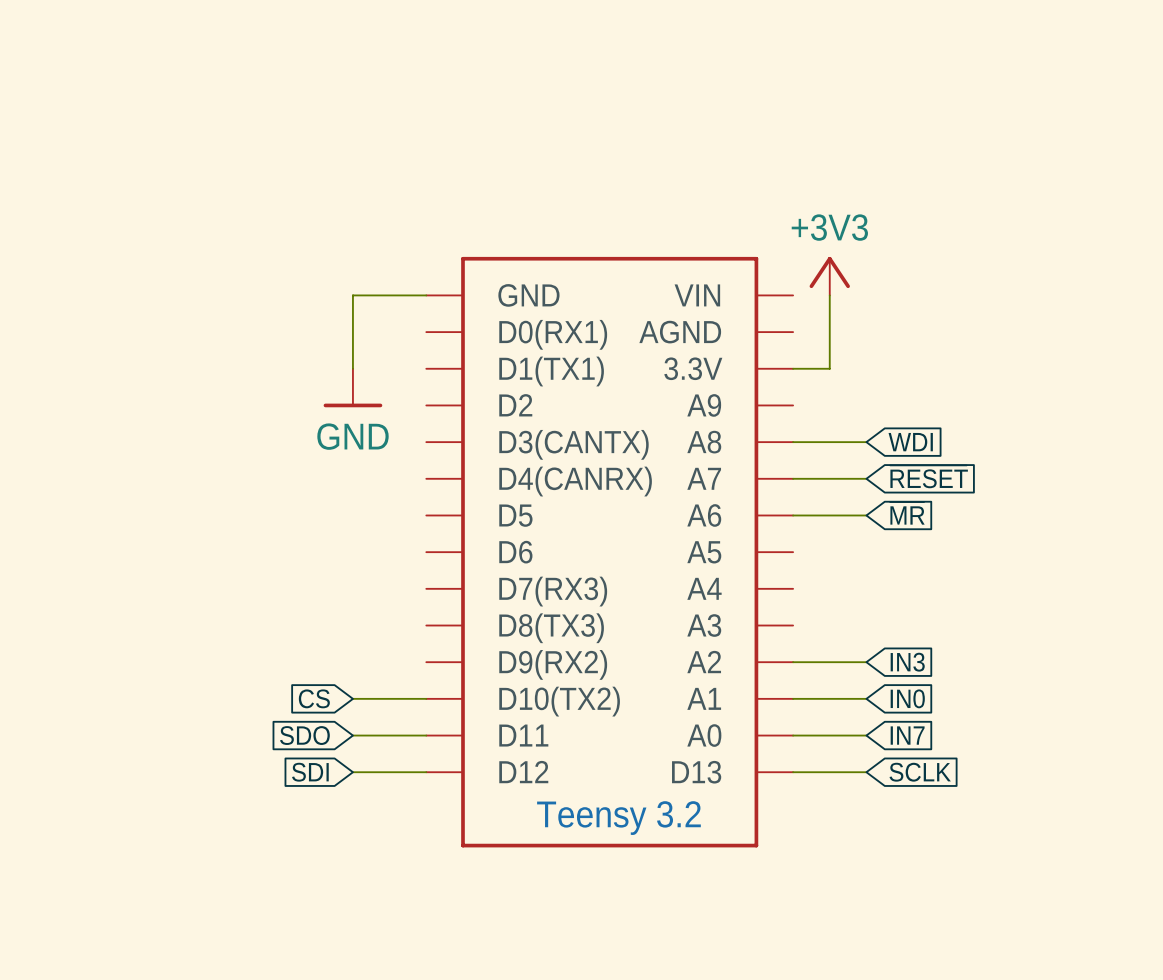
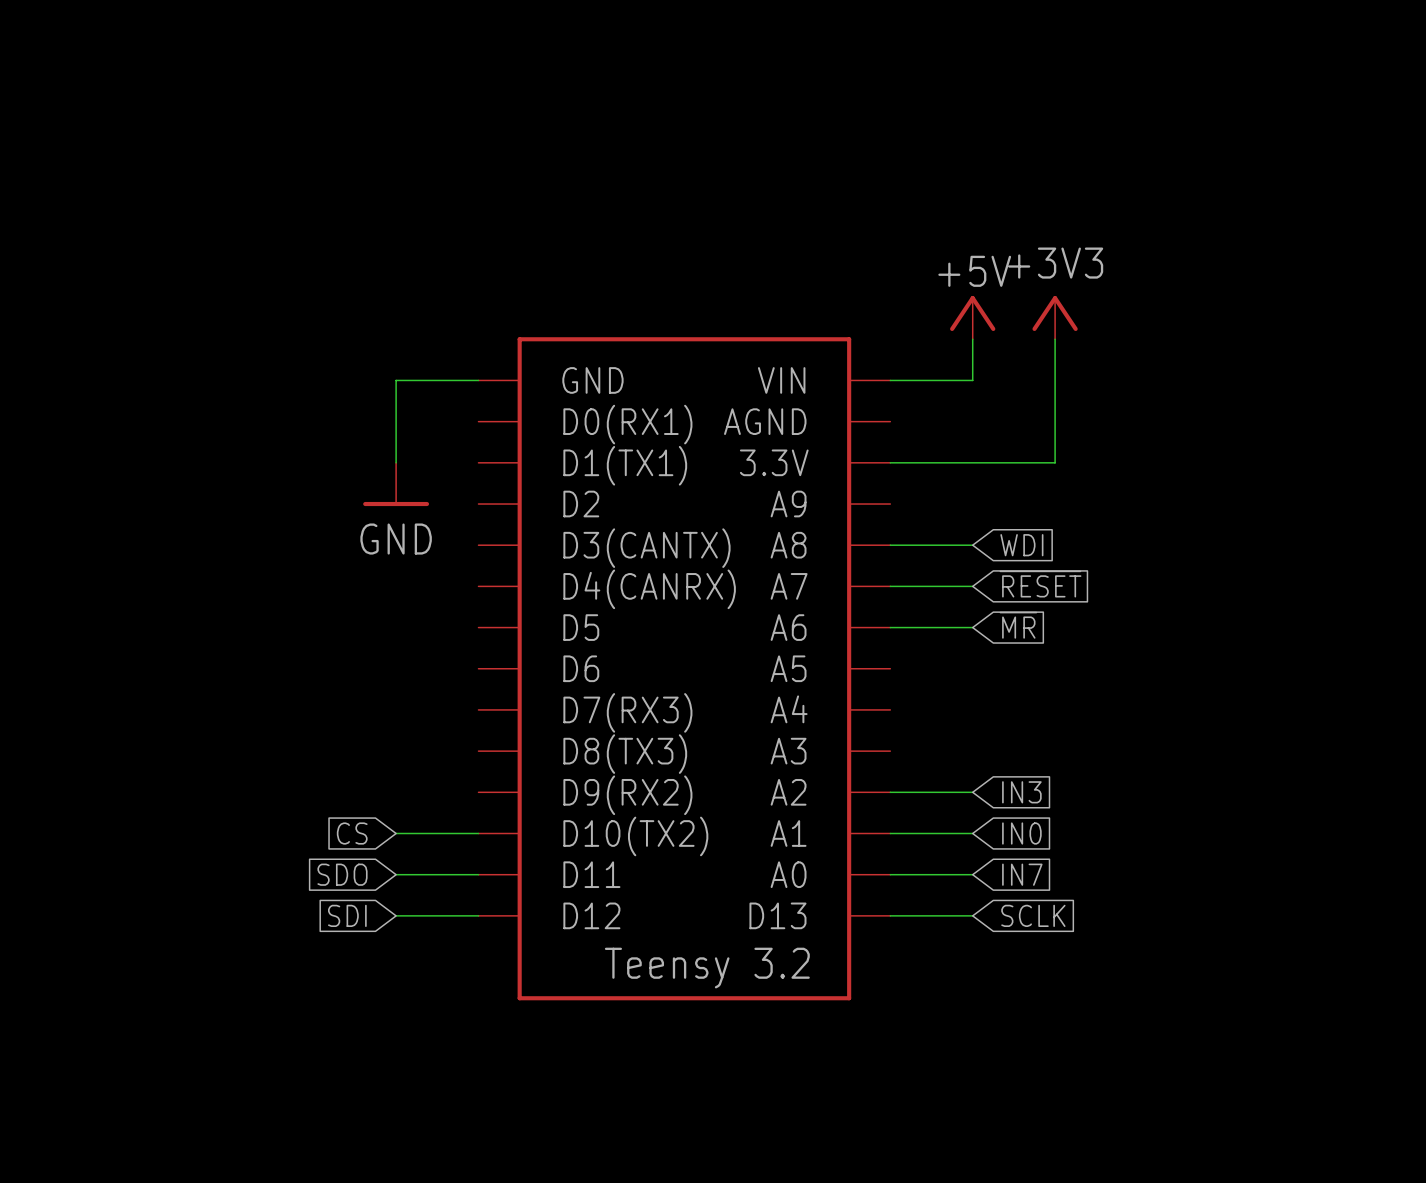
power symbol: none -> +5V (972, 317)
wire: none -> (972, 339) (972, 380) (890, 380)
power symbol position: +3V3 (829, 276) -> +3V3 (1055, 317)
wire: (829, 295) (829, 368) -> (1055, 339) (1055, 462) (931, 462)

